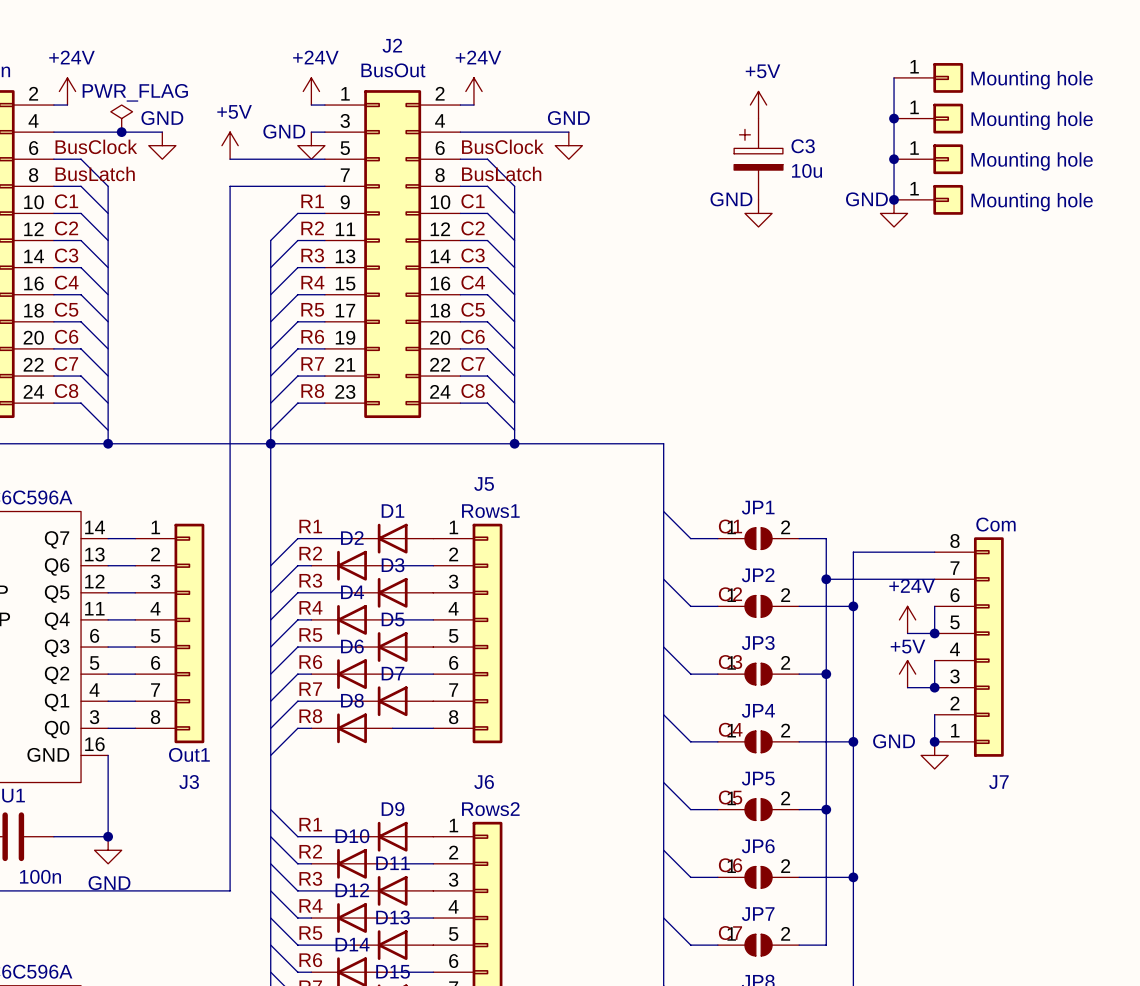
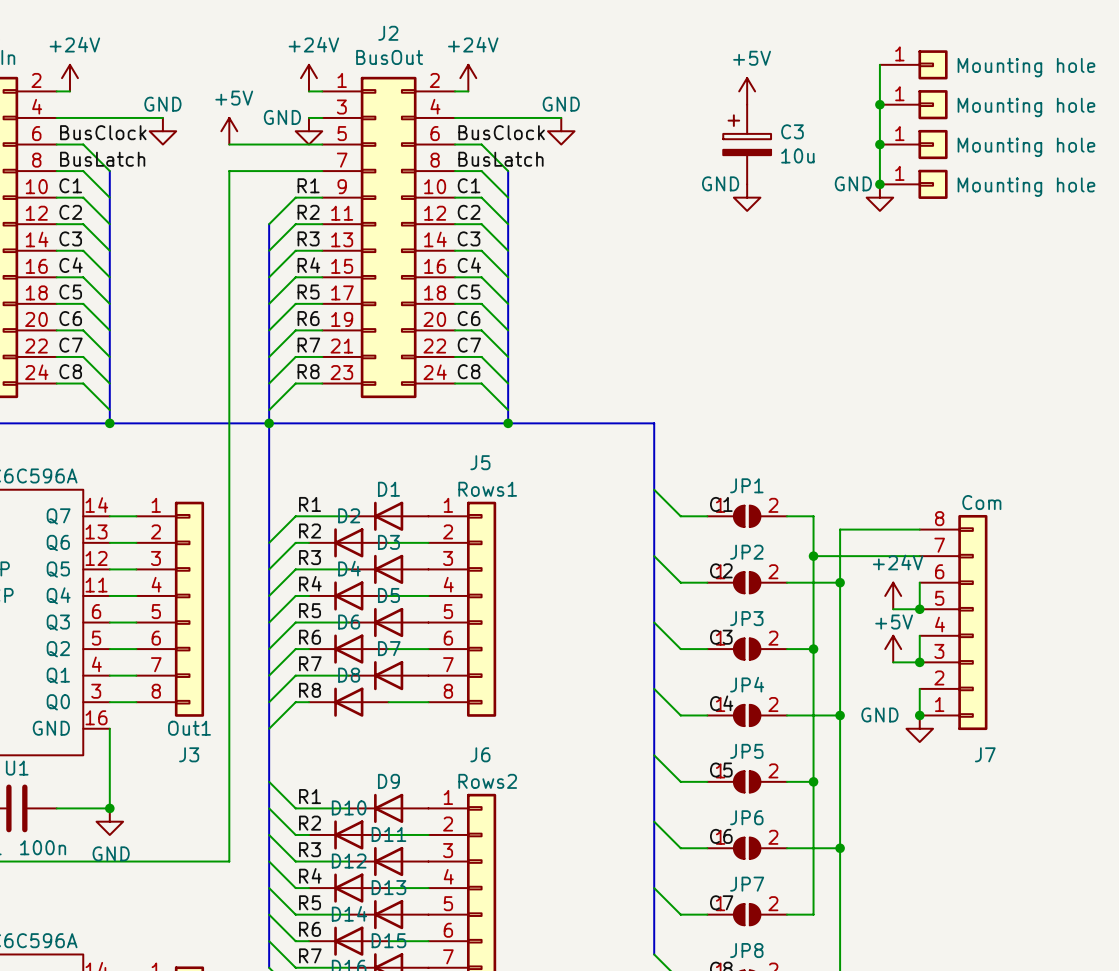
power symbol: PWR_FLAG (121, 118) -> none
junction: (121, 132) -> none

